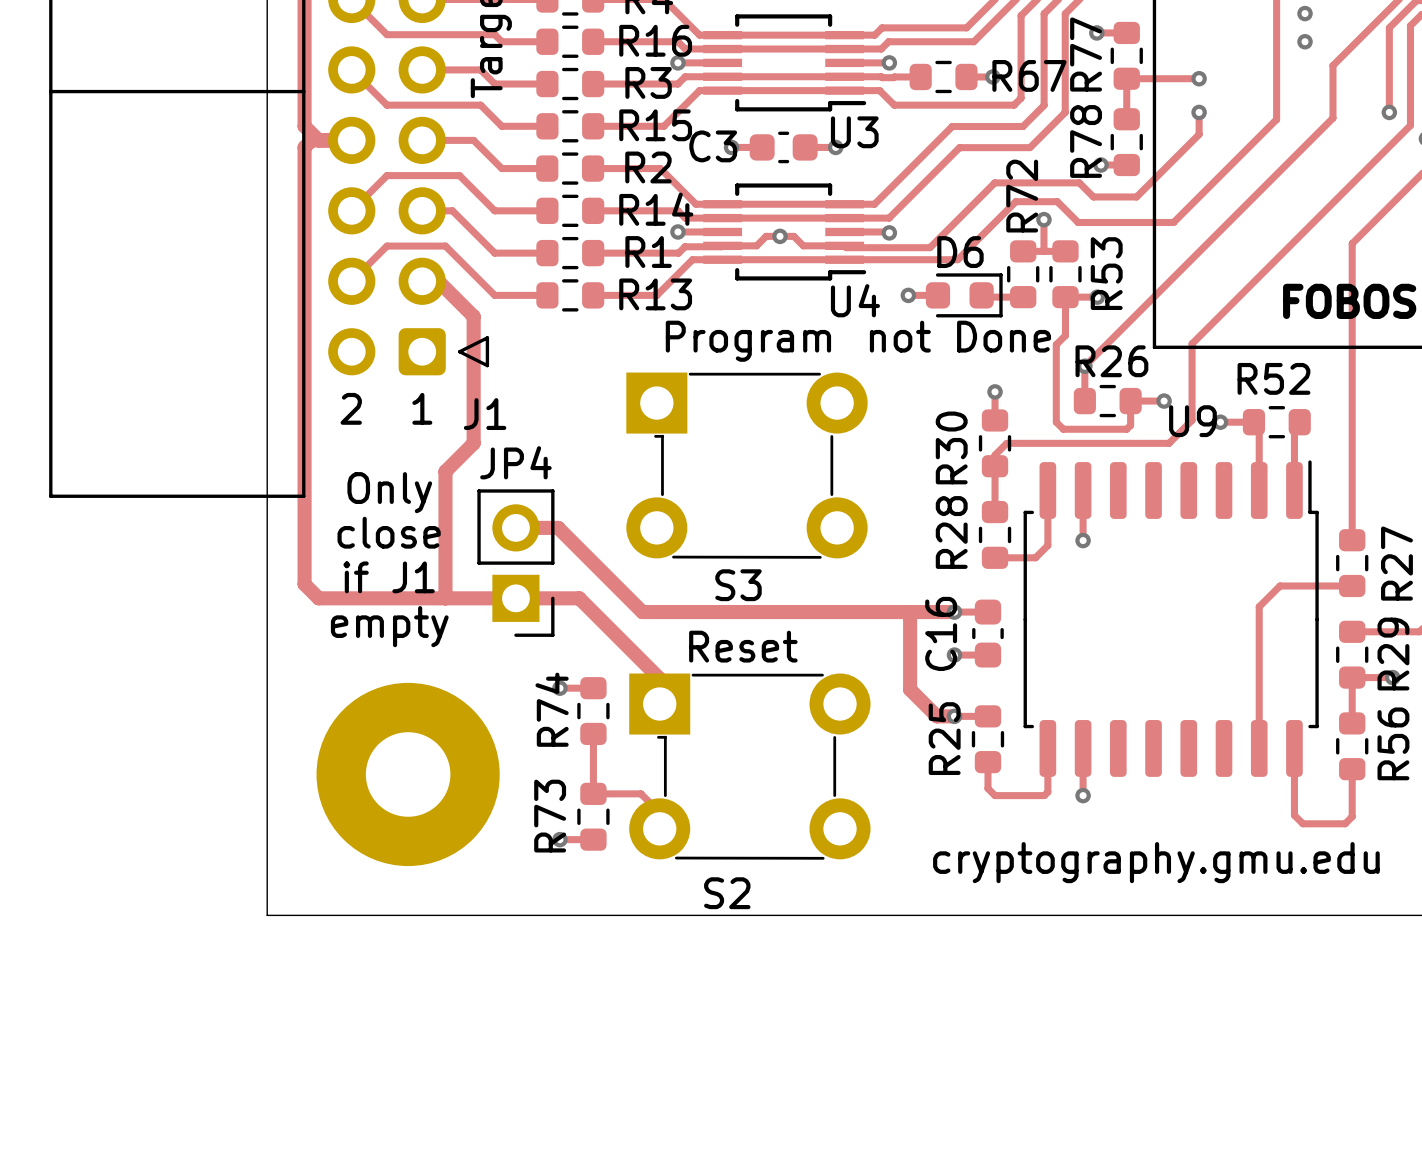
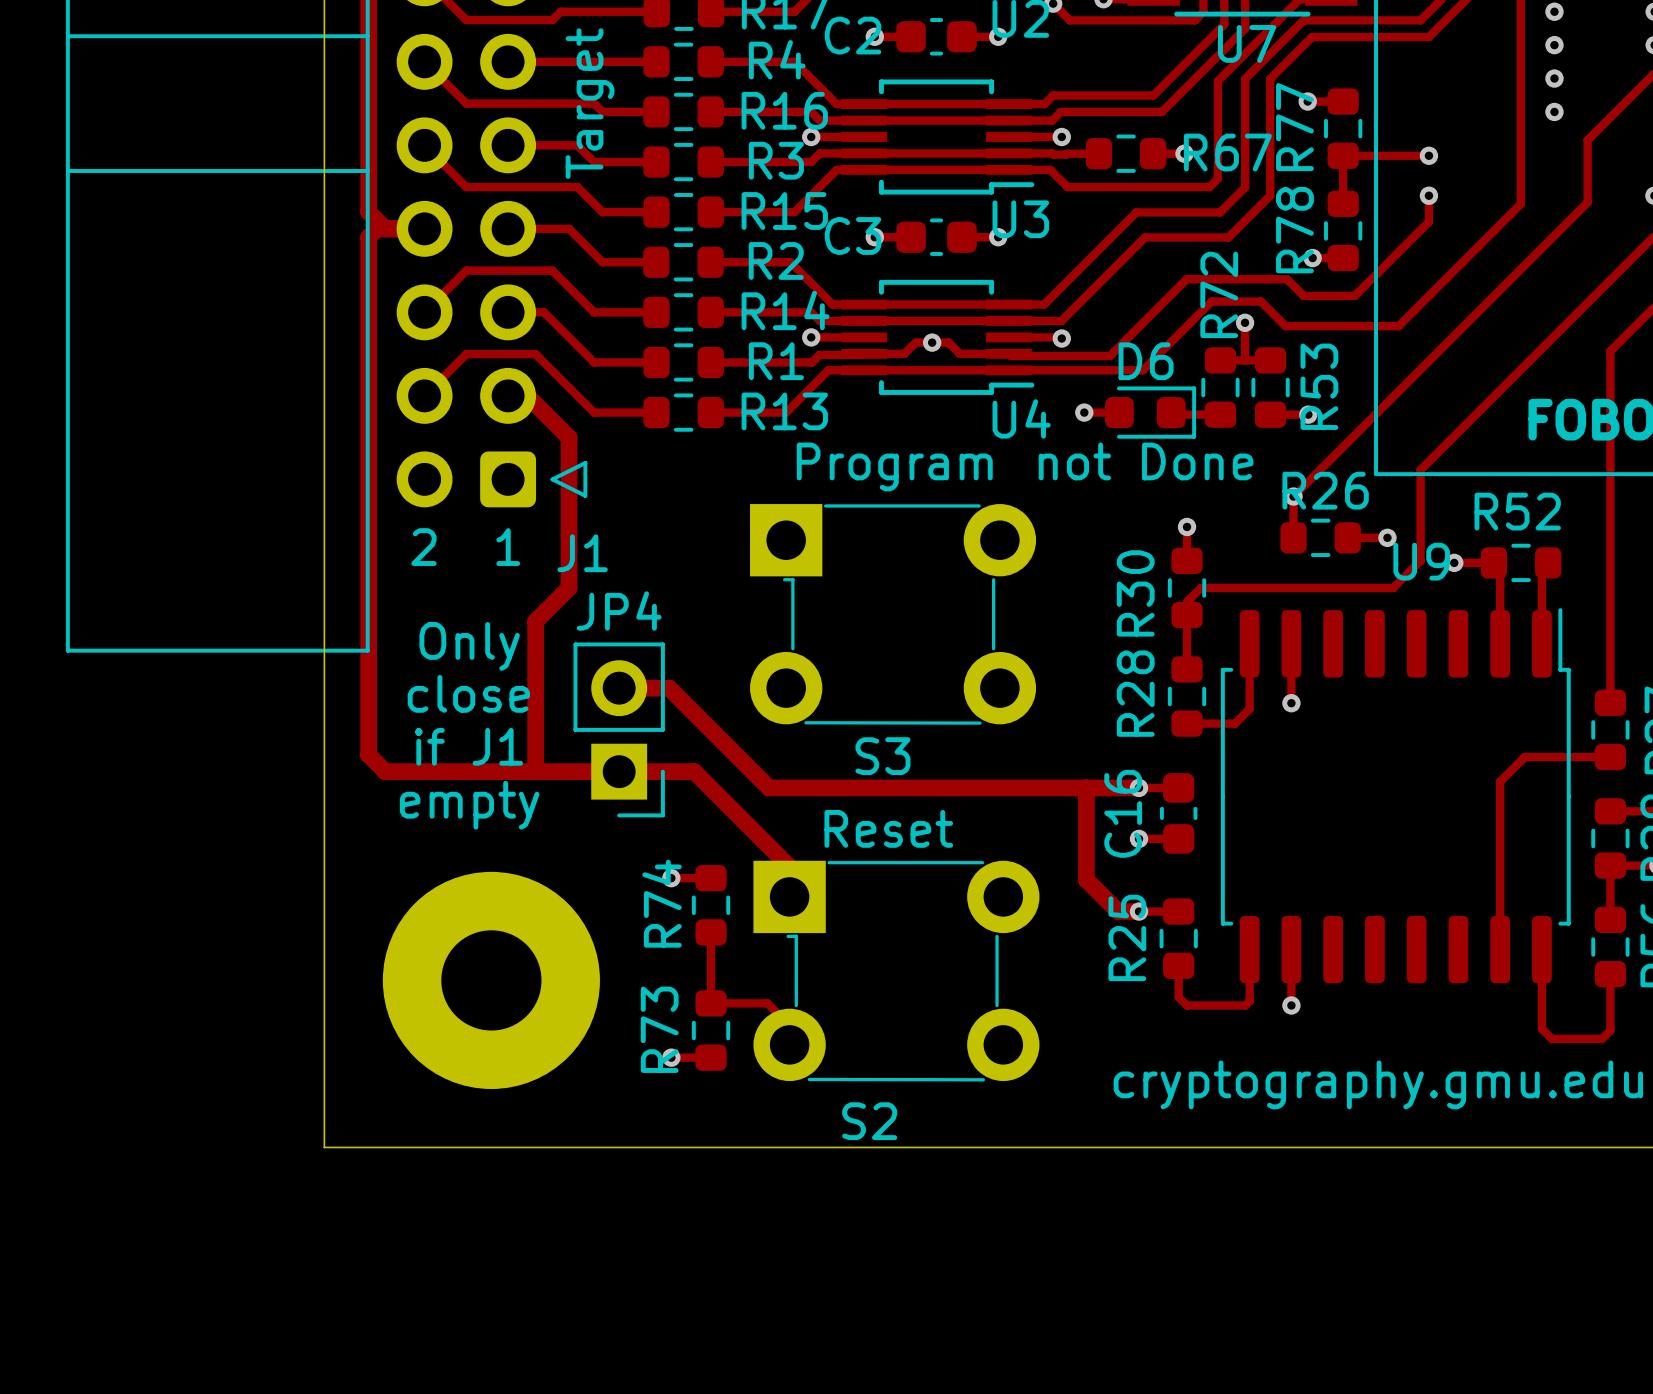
track: (1065, 297) (1065, 335) (1056, 344) (1056, 422) (1063, 429) (1126, 429) (1130, 425) (1130, 401) -> none

